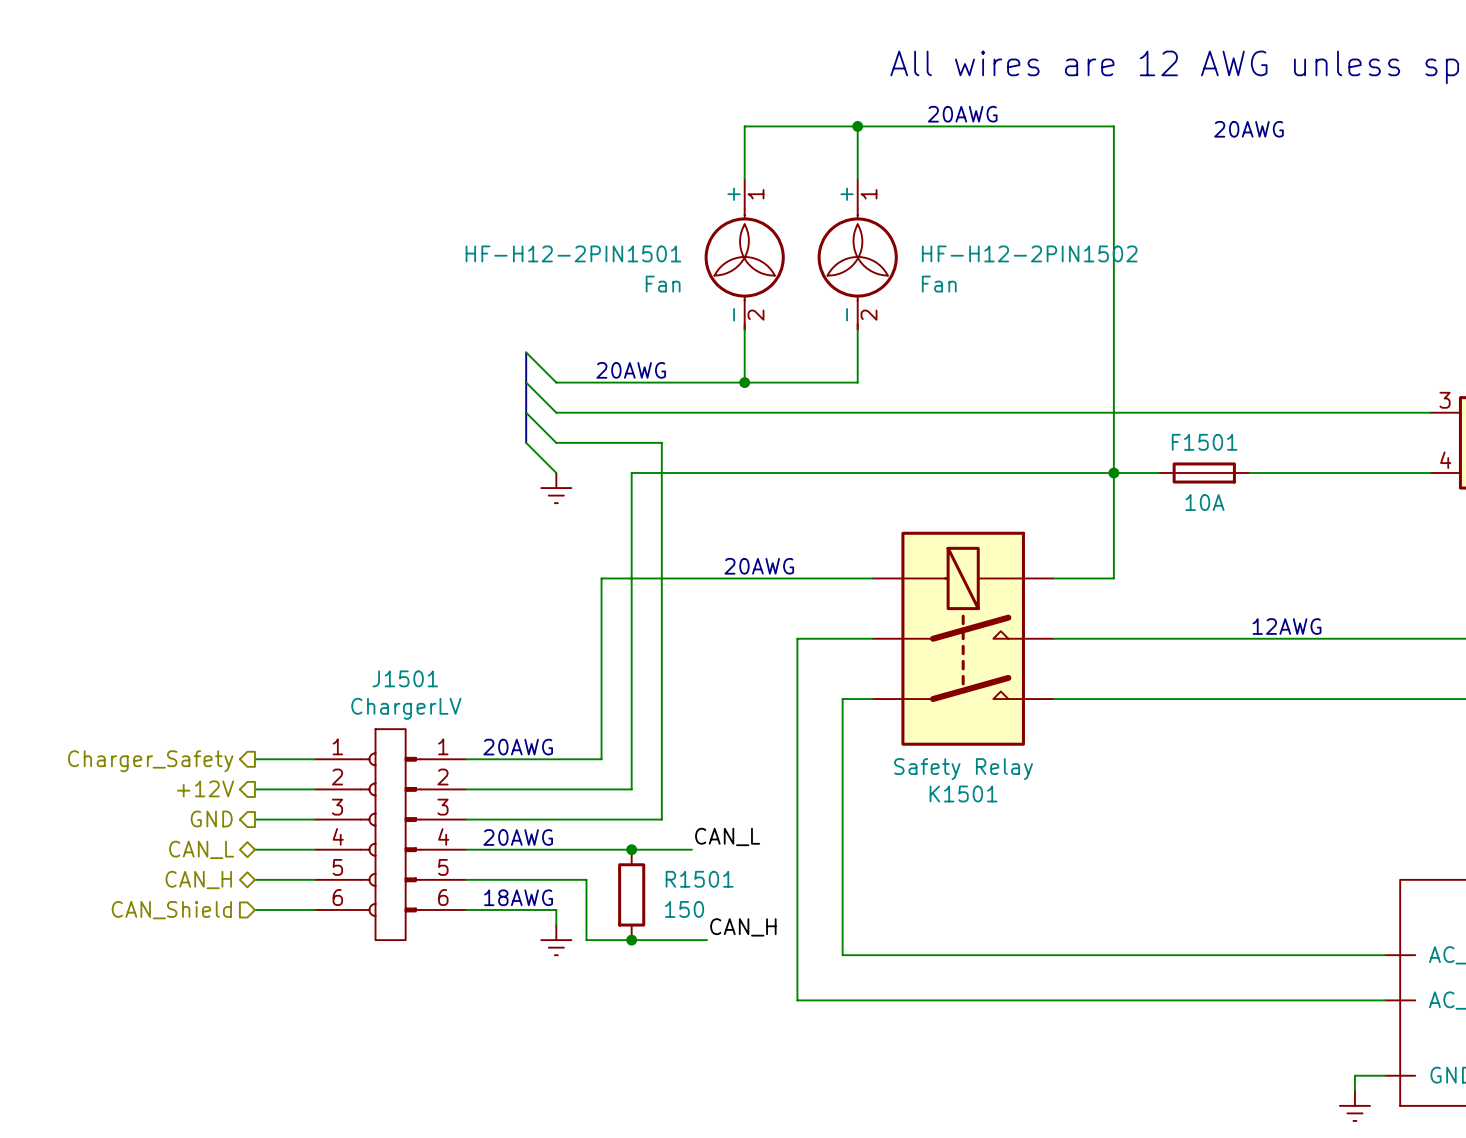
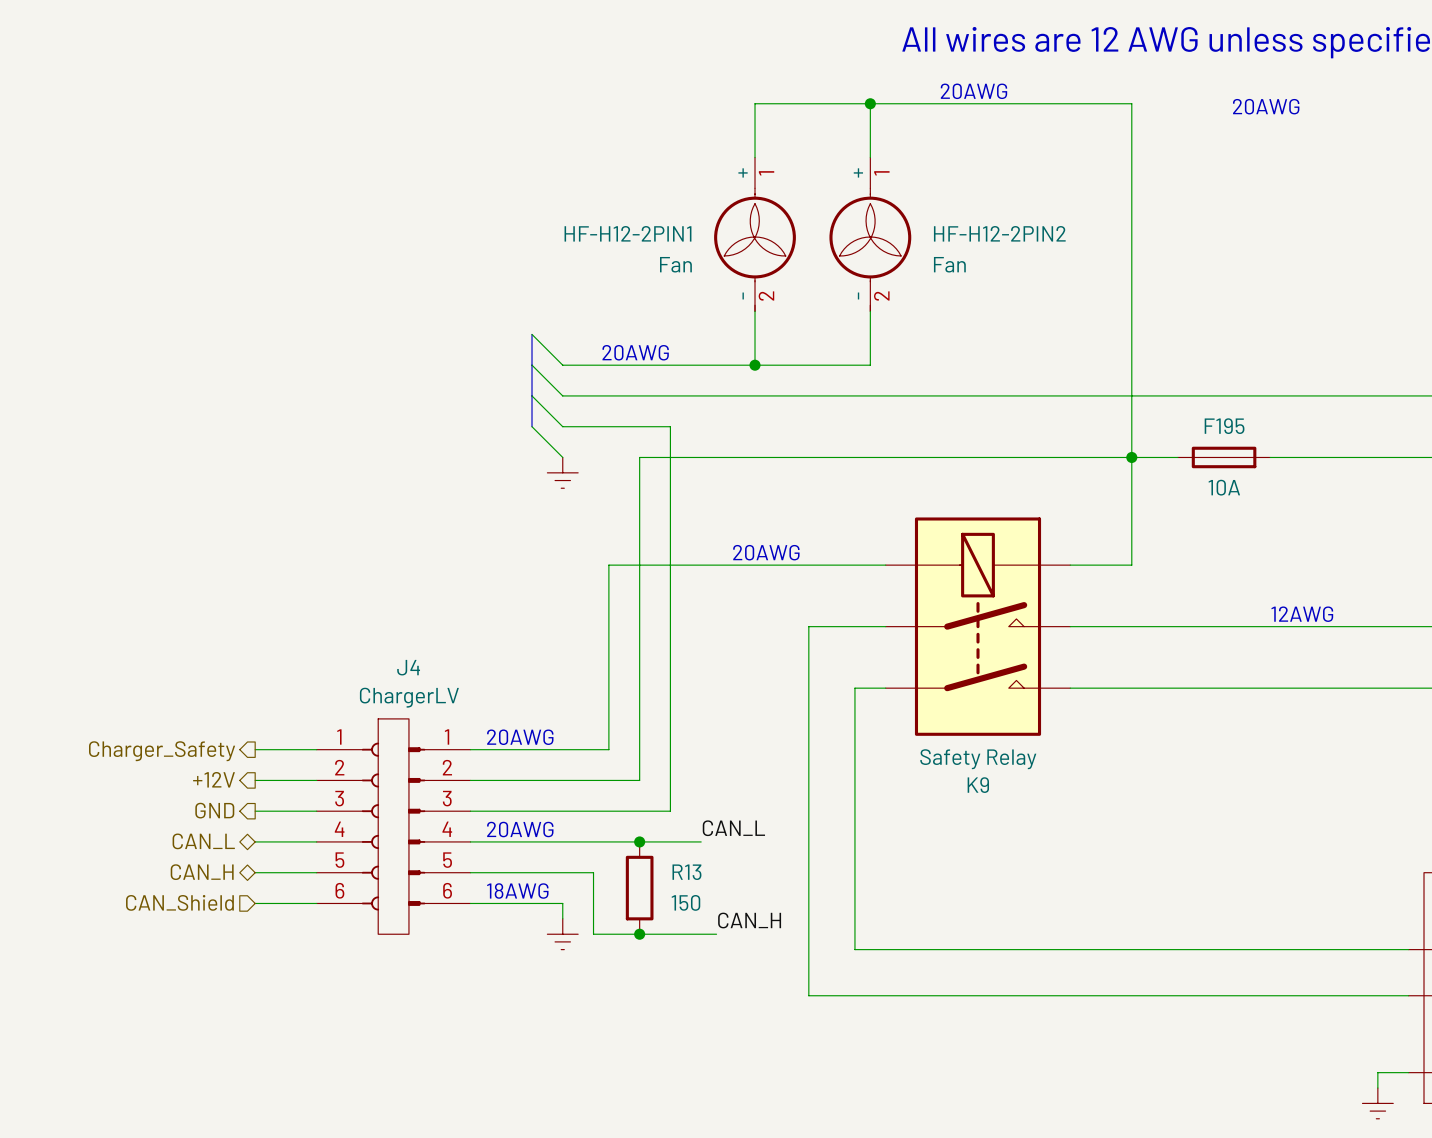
HF-H12-2PIN1501 name: HF-H12-2PIN1501 (573, 253) -> HF-H12-2PIN1 (627, 233)
HF-H12-2PIN1502 name: HF-H12-2PIN1502 (1029, 253) -> HF-H12-2PIN2 (999, 233)
F1501 name: F1501 (1204, 442) -> F195 (1224, 426)
J1501 name: J1501 (405, 678) -> J4 (408, 667)
K1501 name: K1501 (963, 793) -> K9 (978, 785)
R1501 name: R1501 (699, 879) -> R13 (686, 872)

